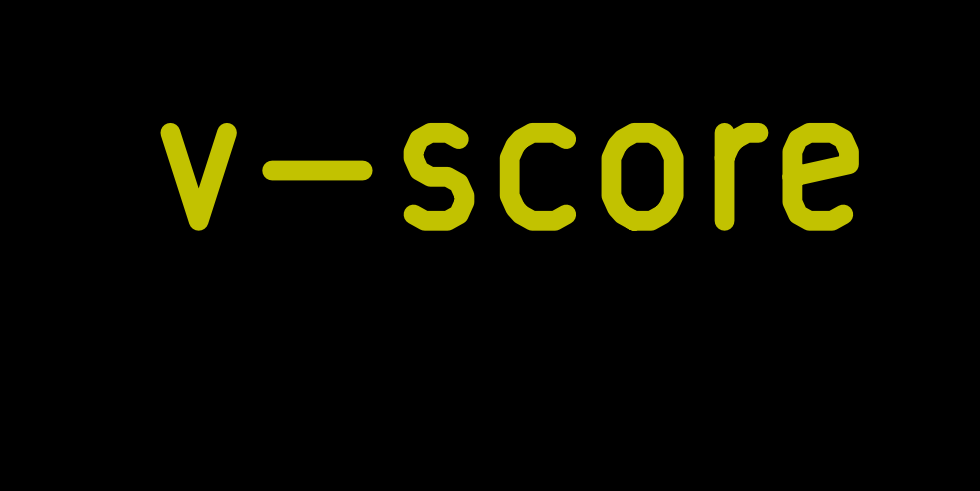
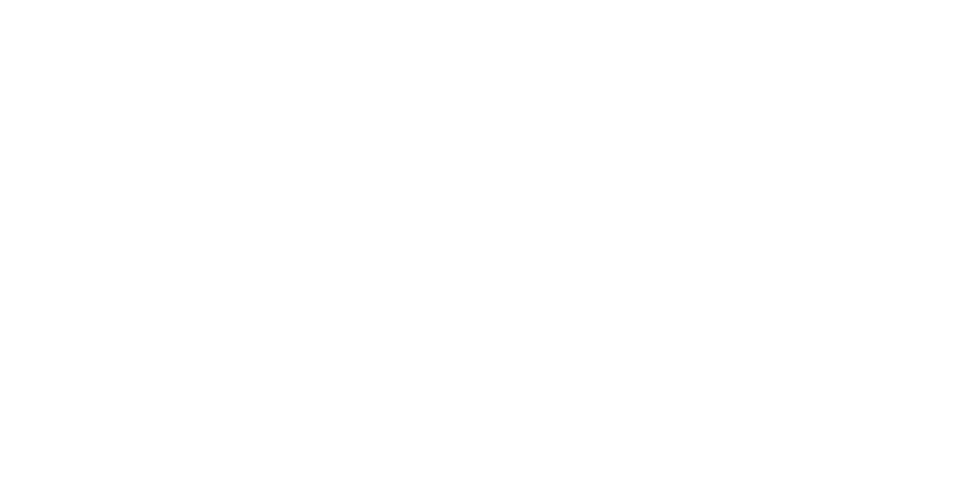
text: v-score (509, 176) -> none

